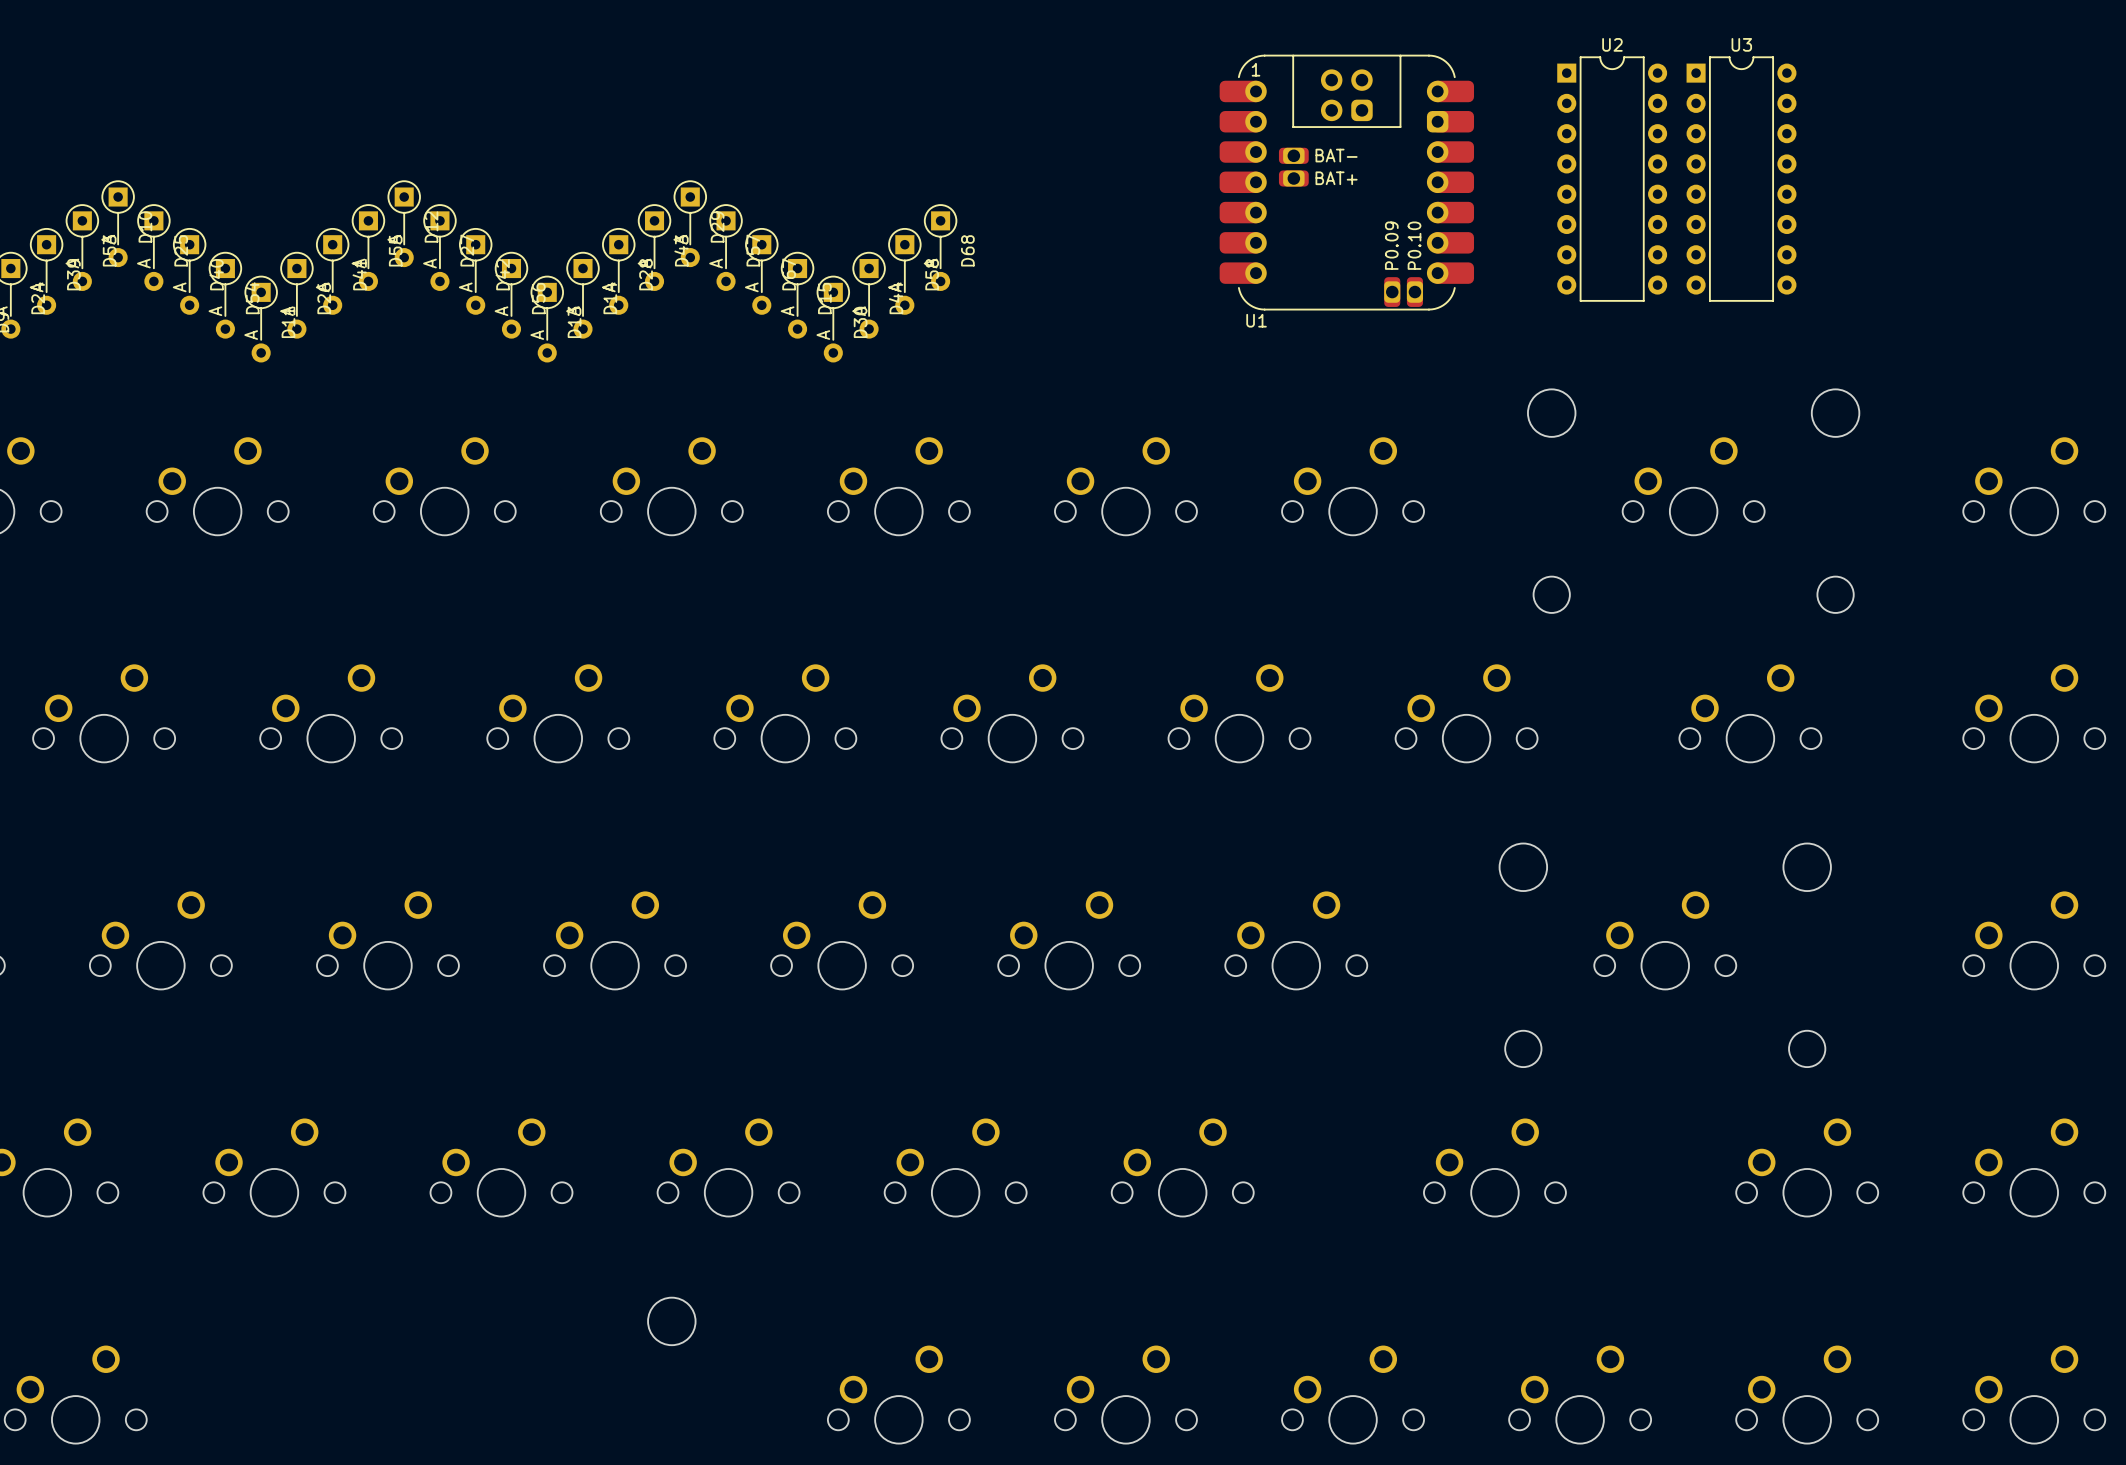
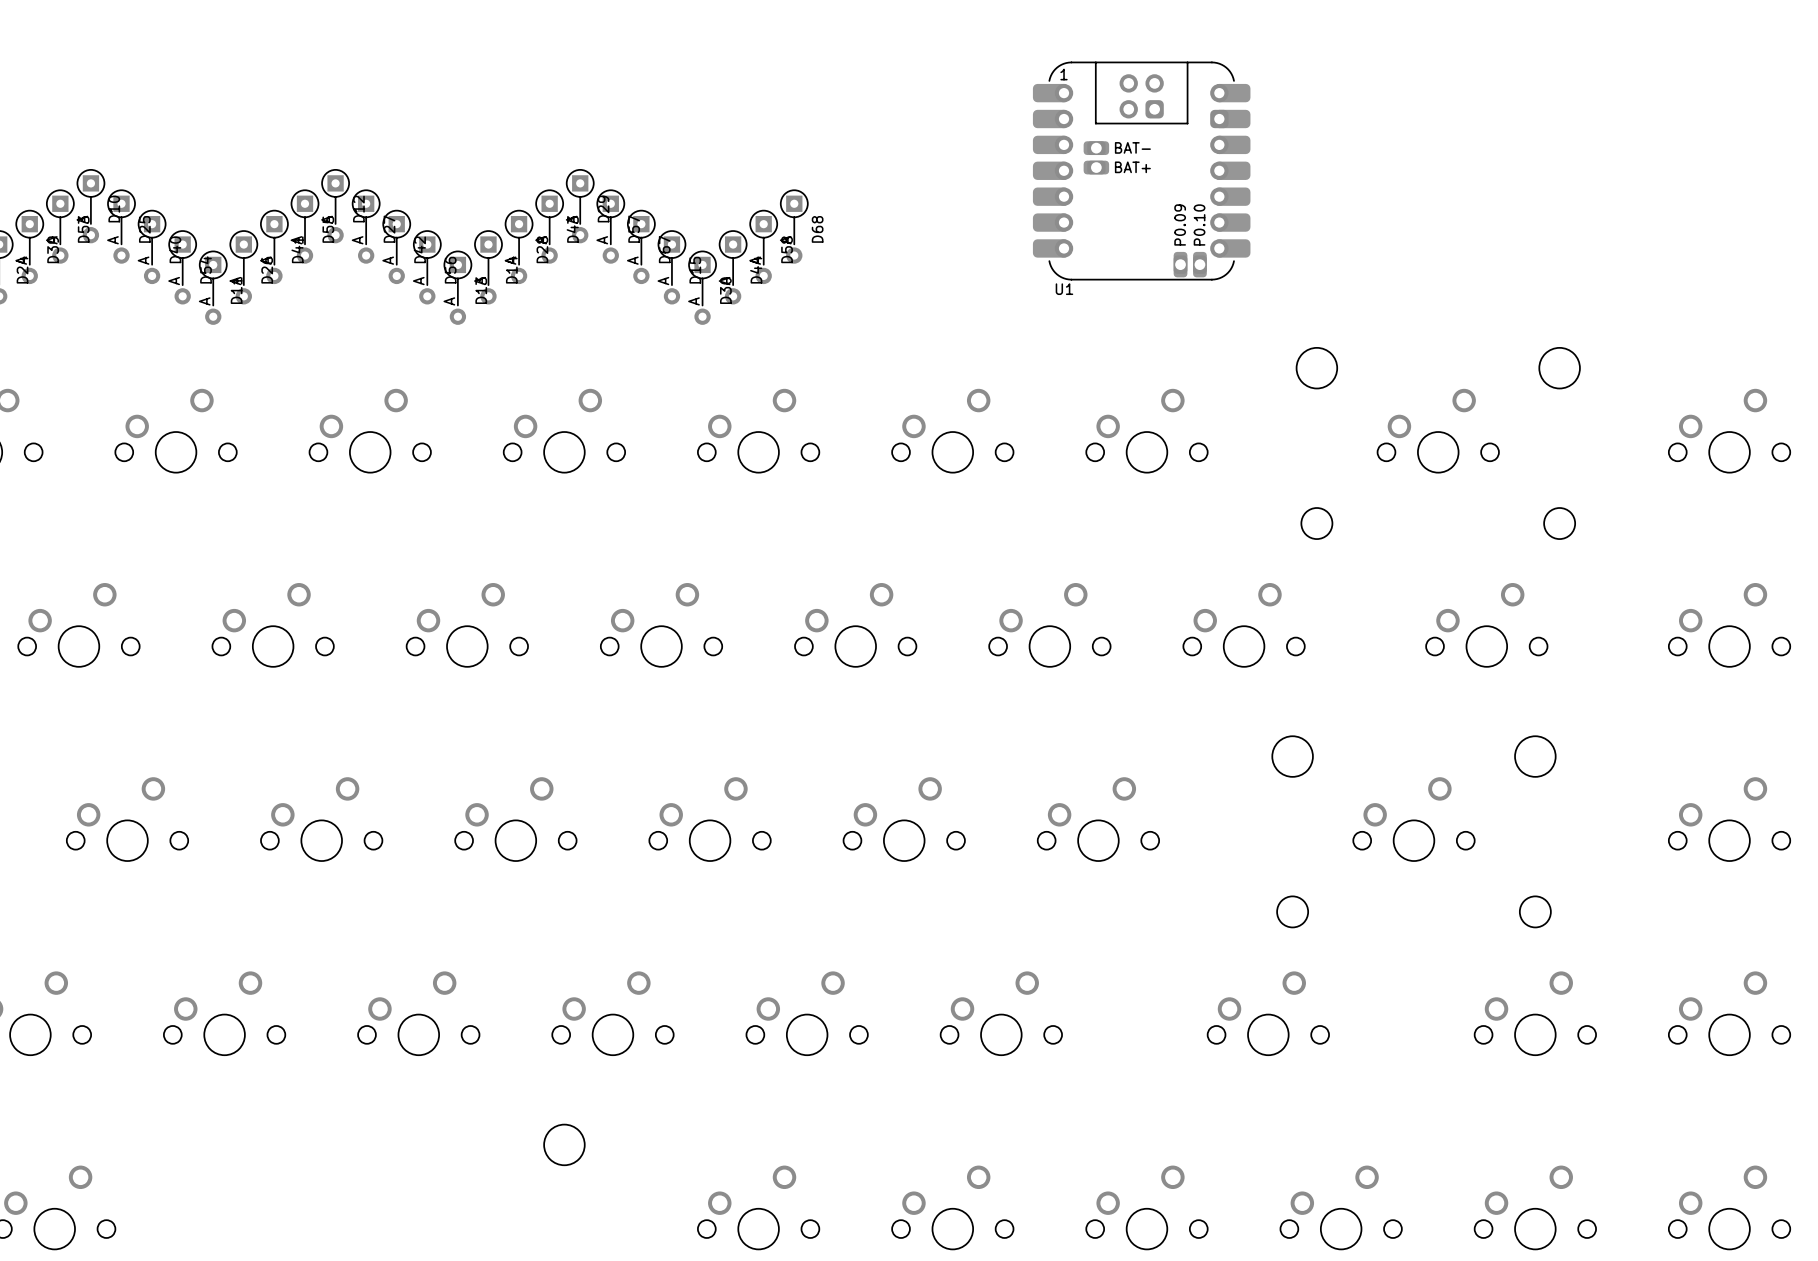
U2: (1612, 179) -> none
U3: (1741, 179) -> none

